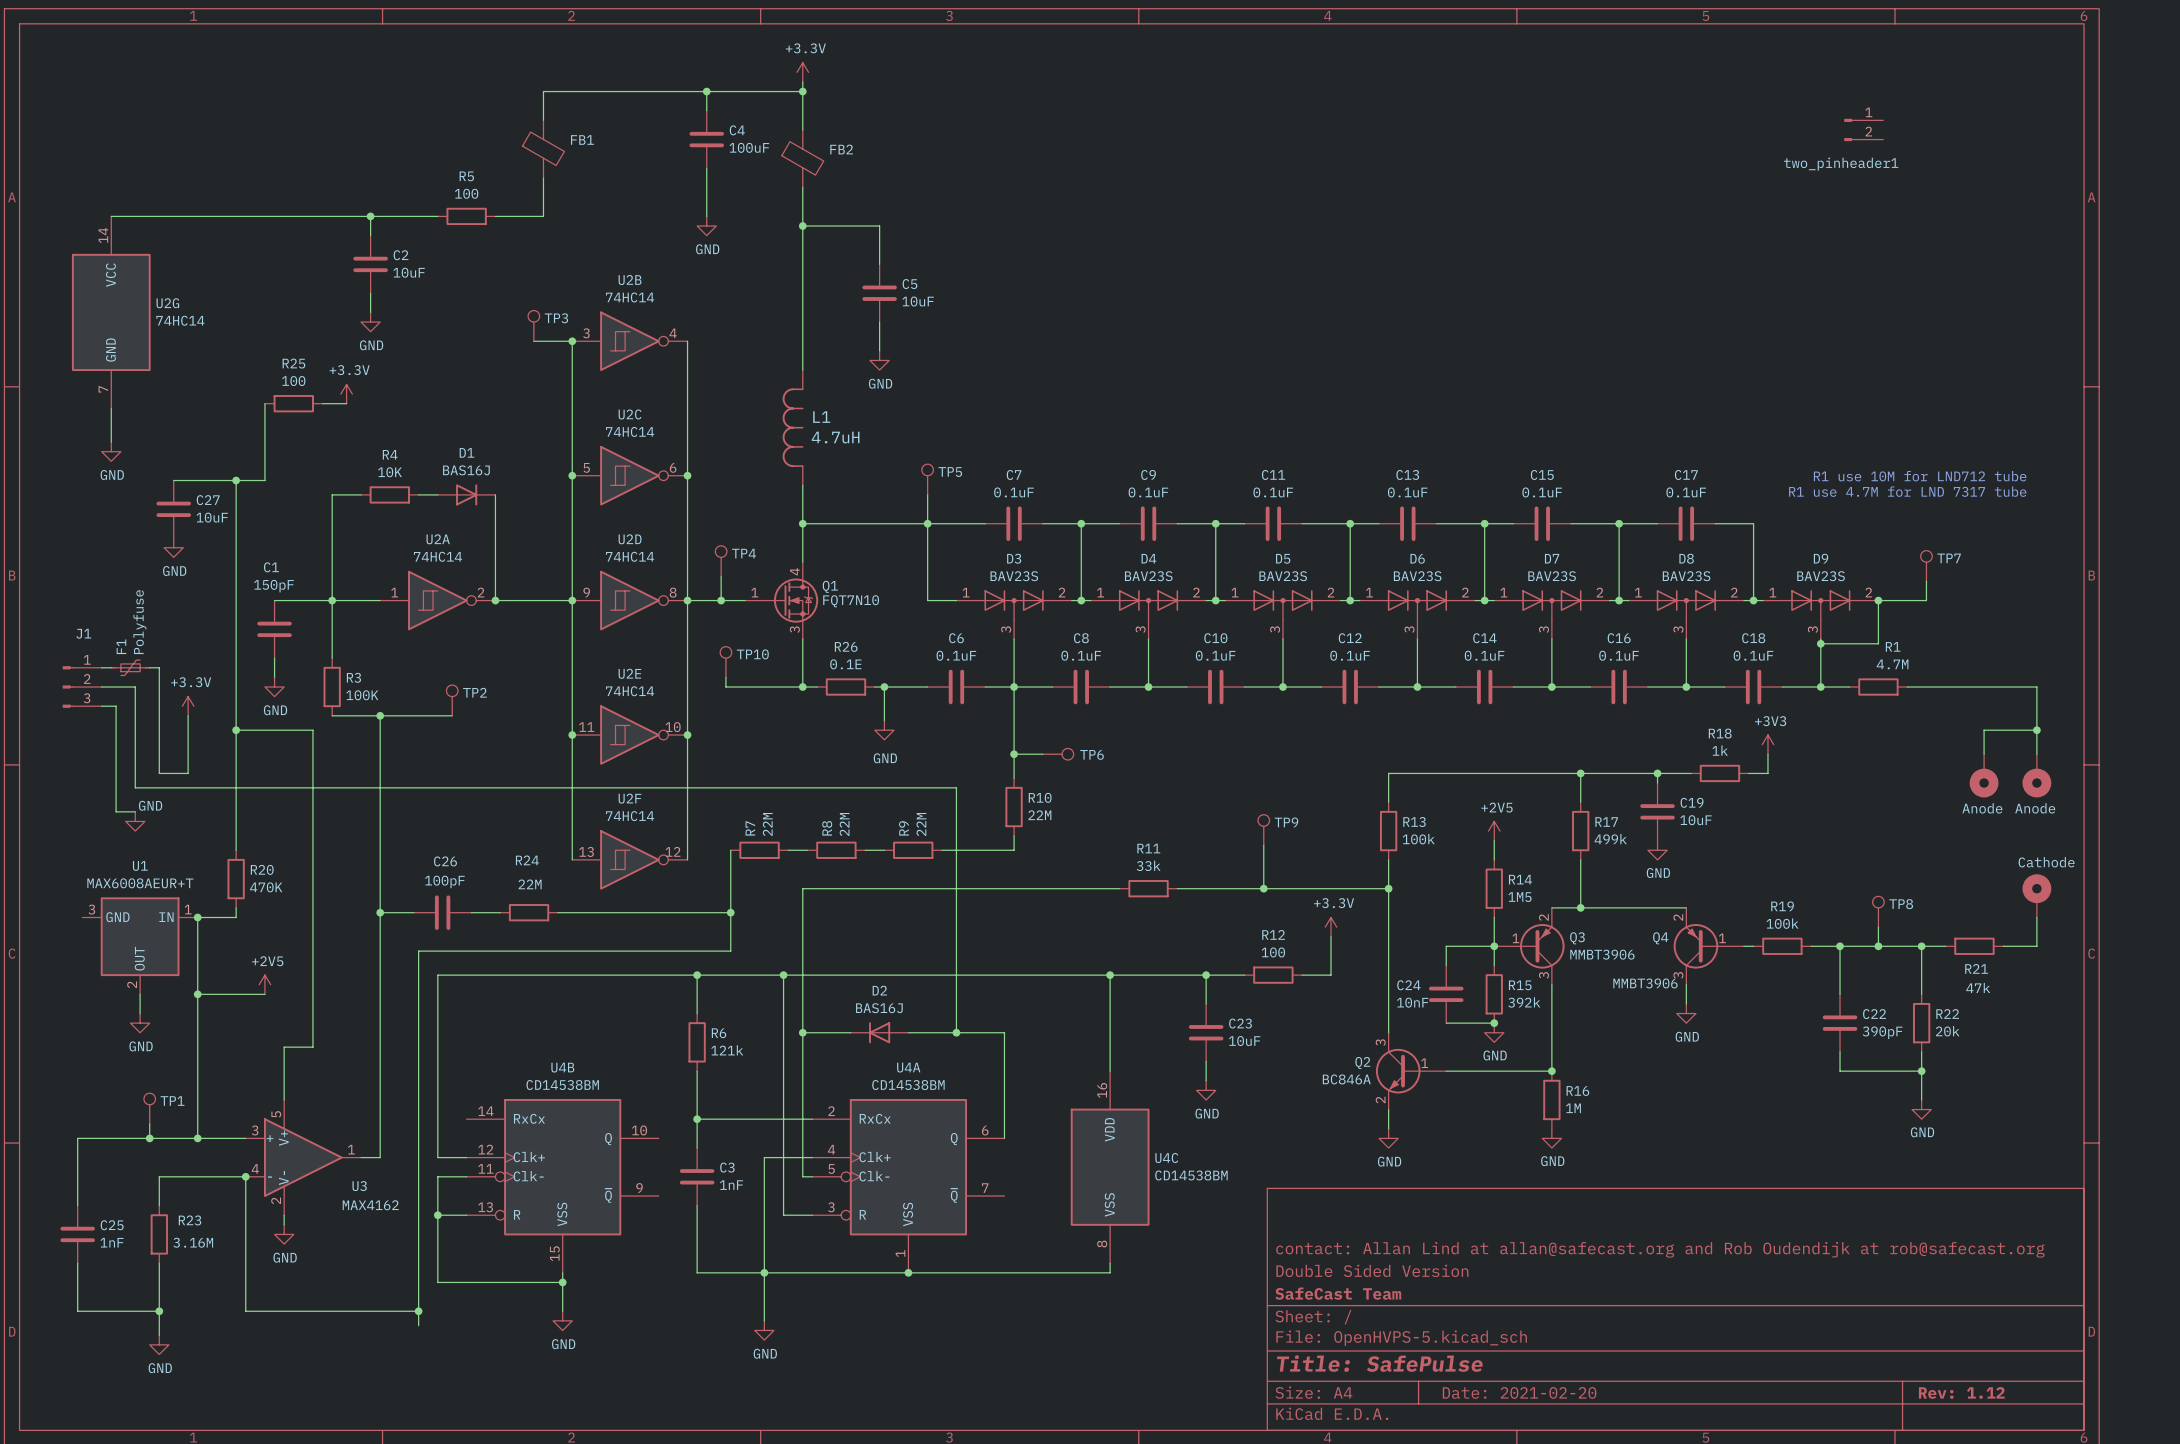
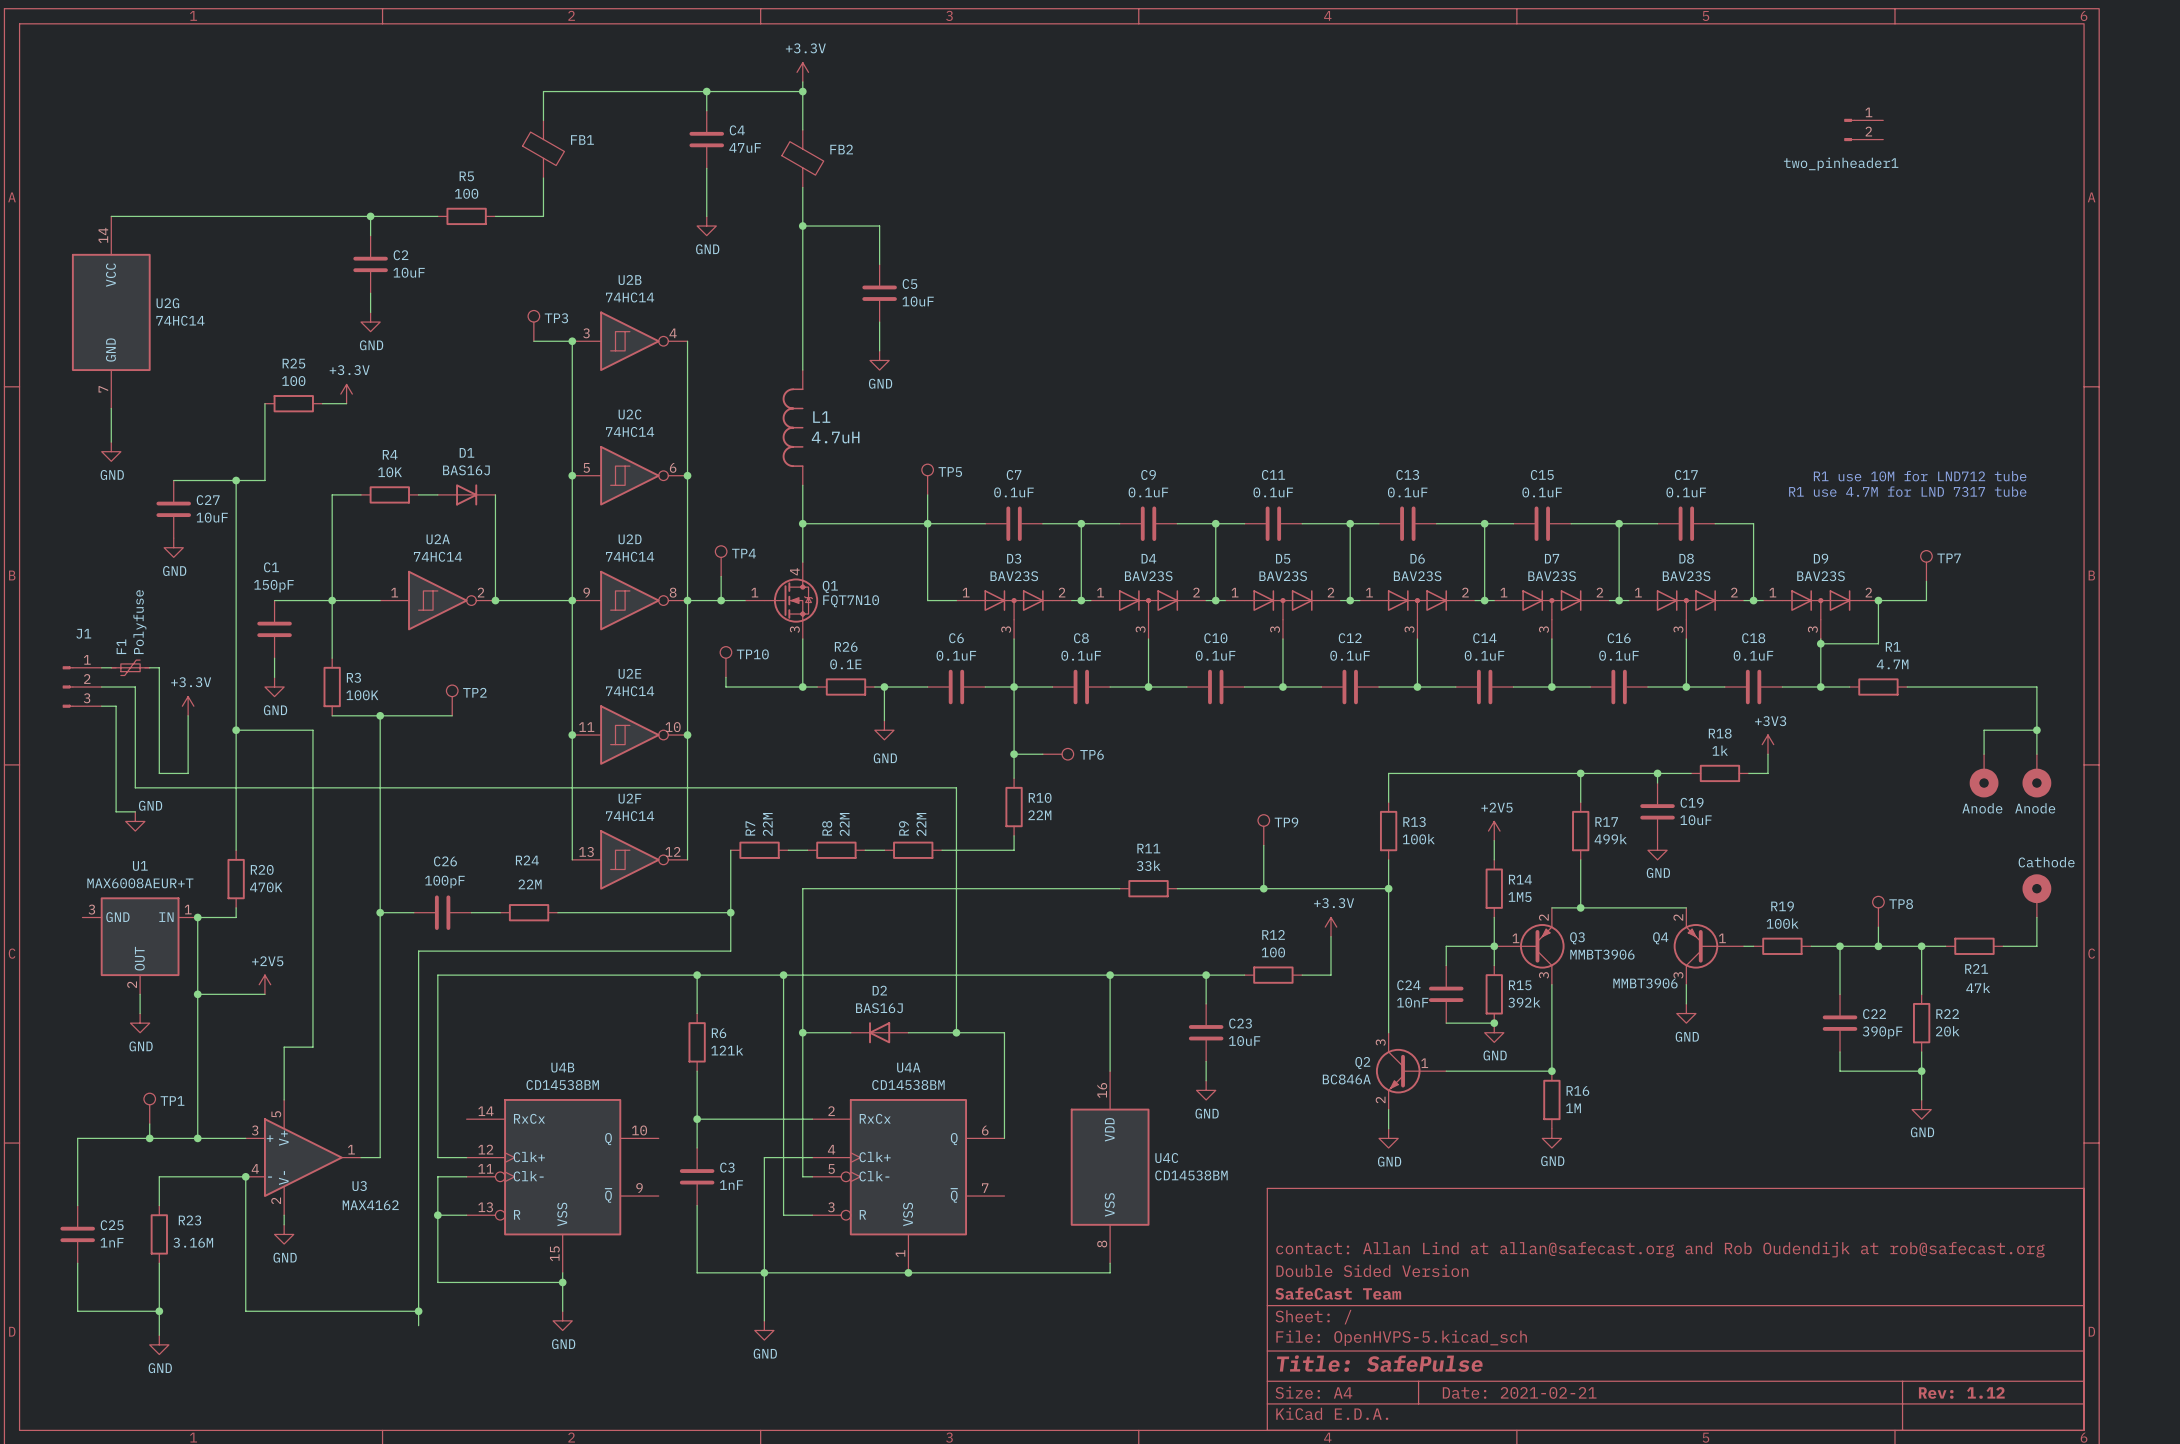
C4 value: 100uF (749, 147) -> 47uF (745, 147)
title block: Date: 2021-02-20 (1519, 1392) -> Date: 2021-02-21 (1519, 1392)

